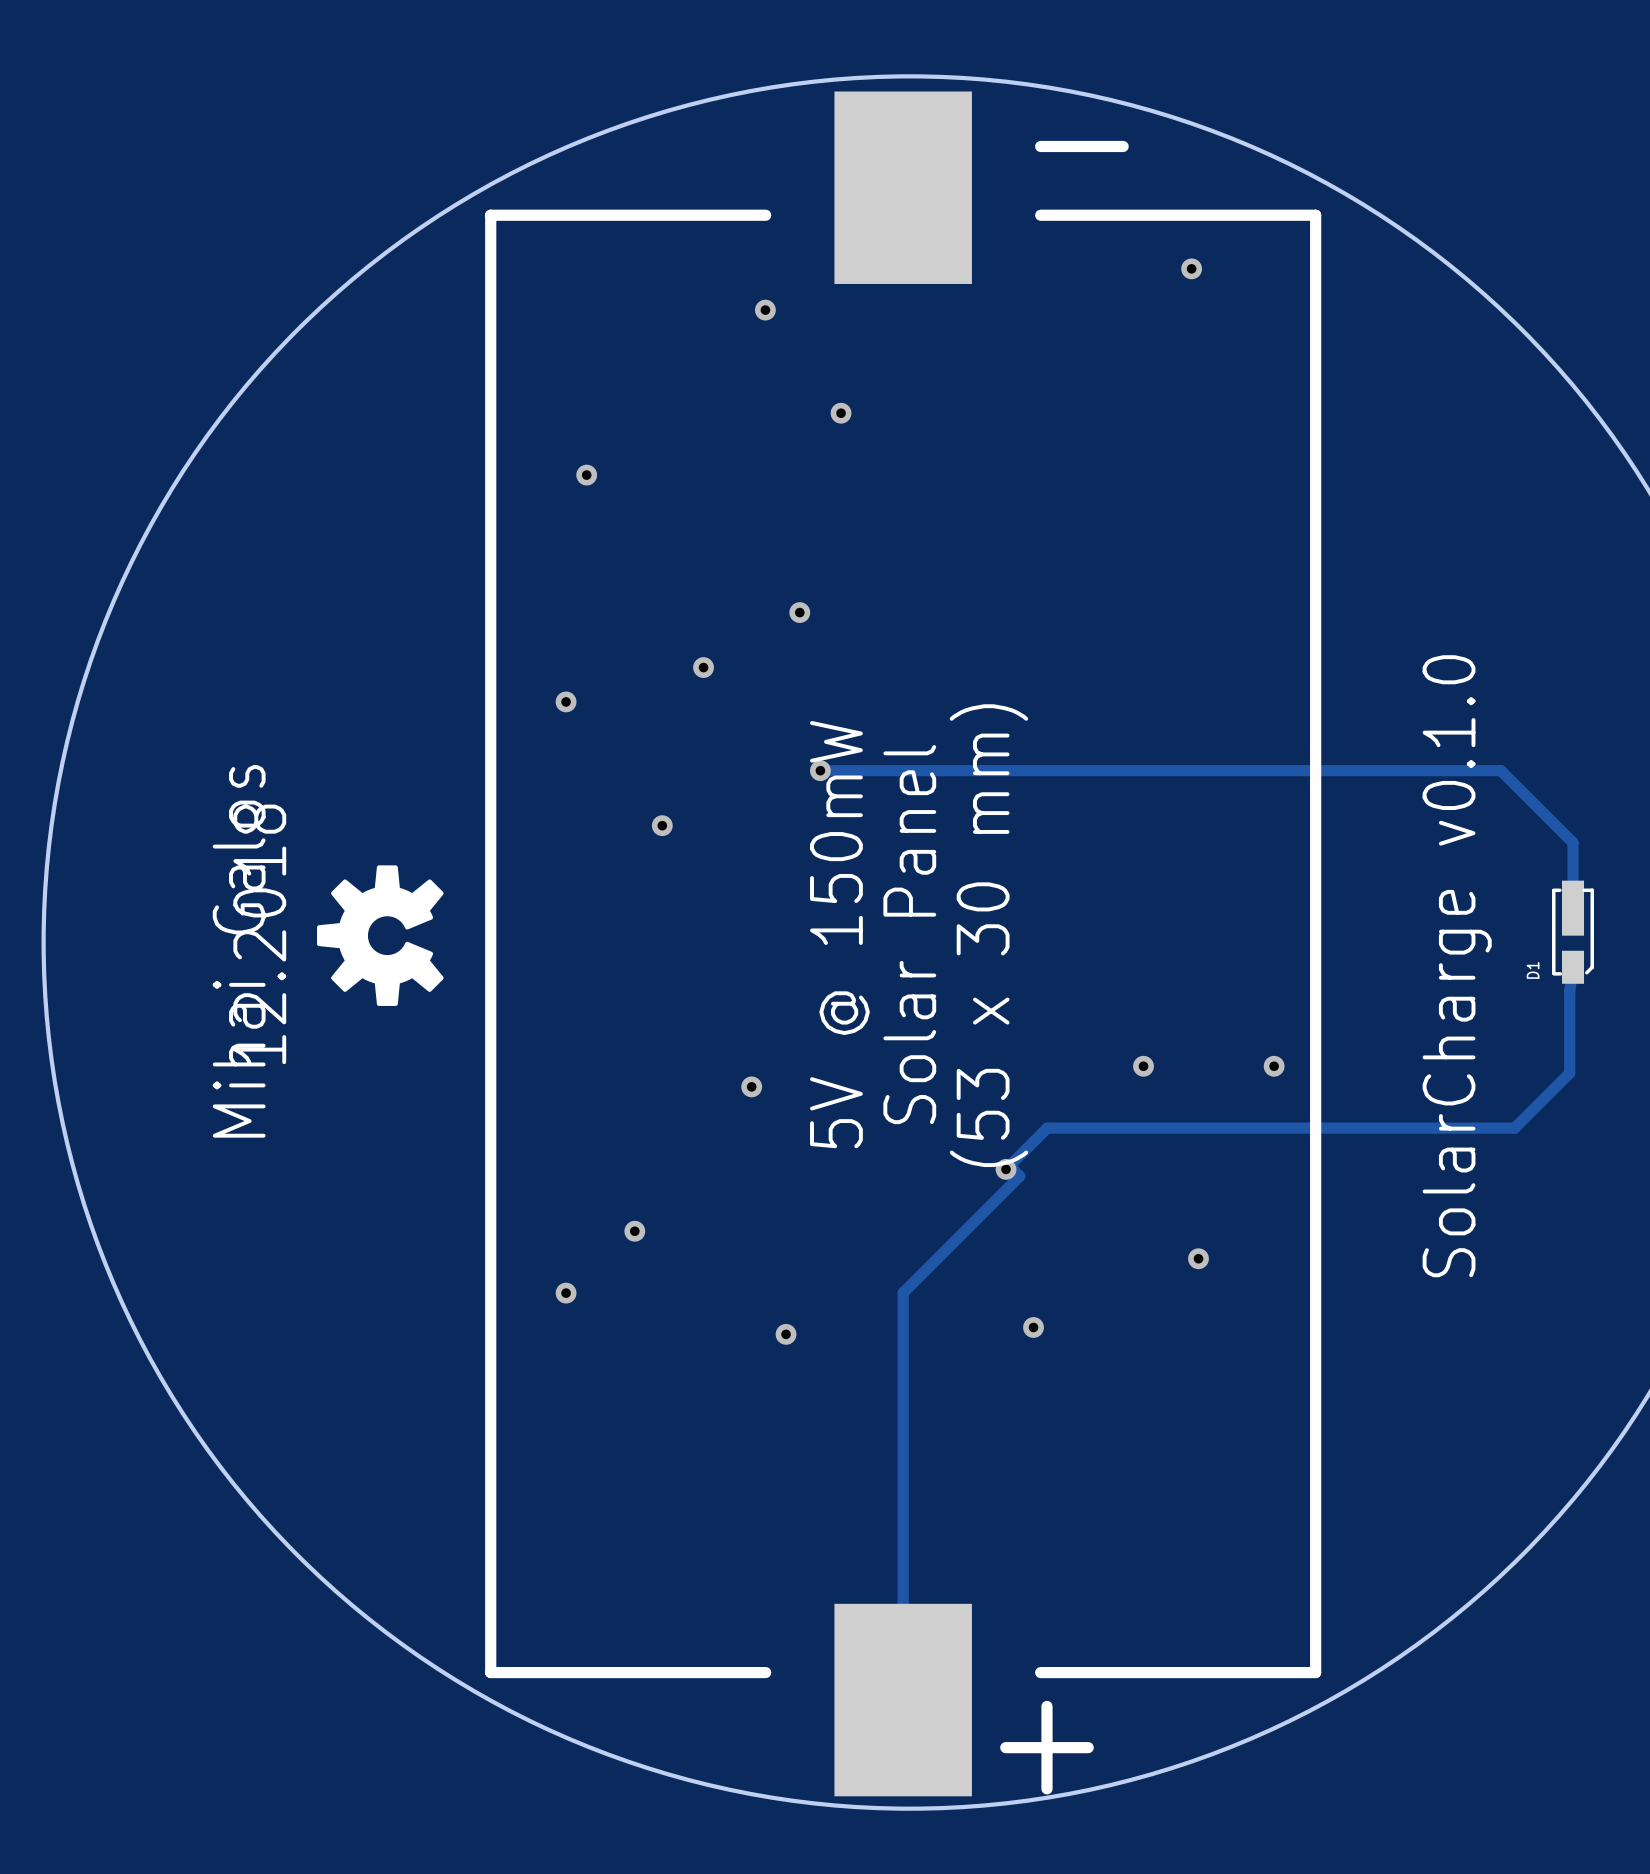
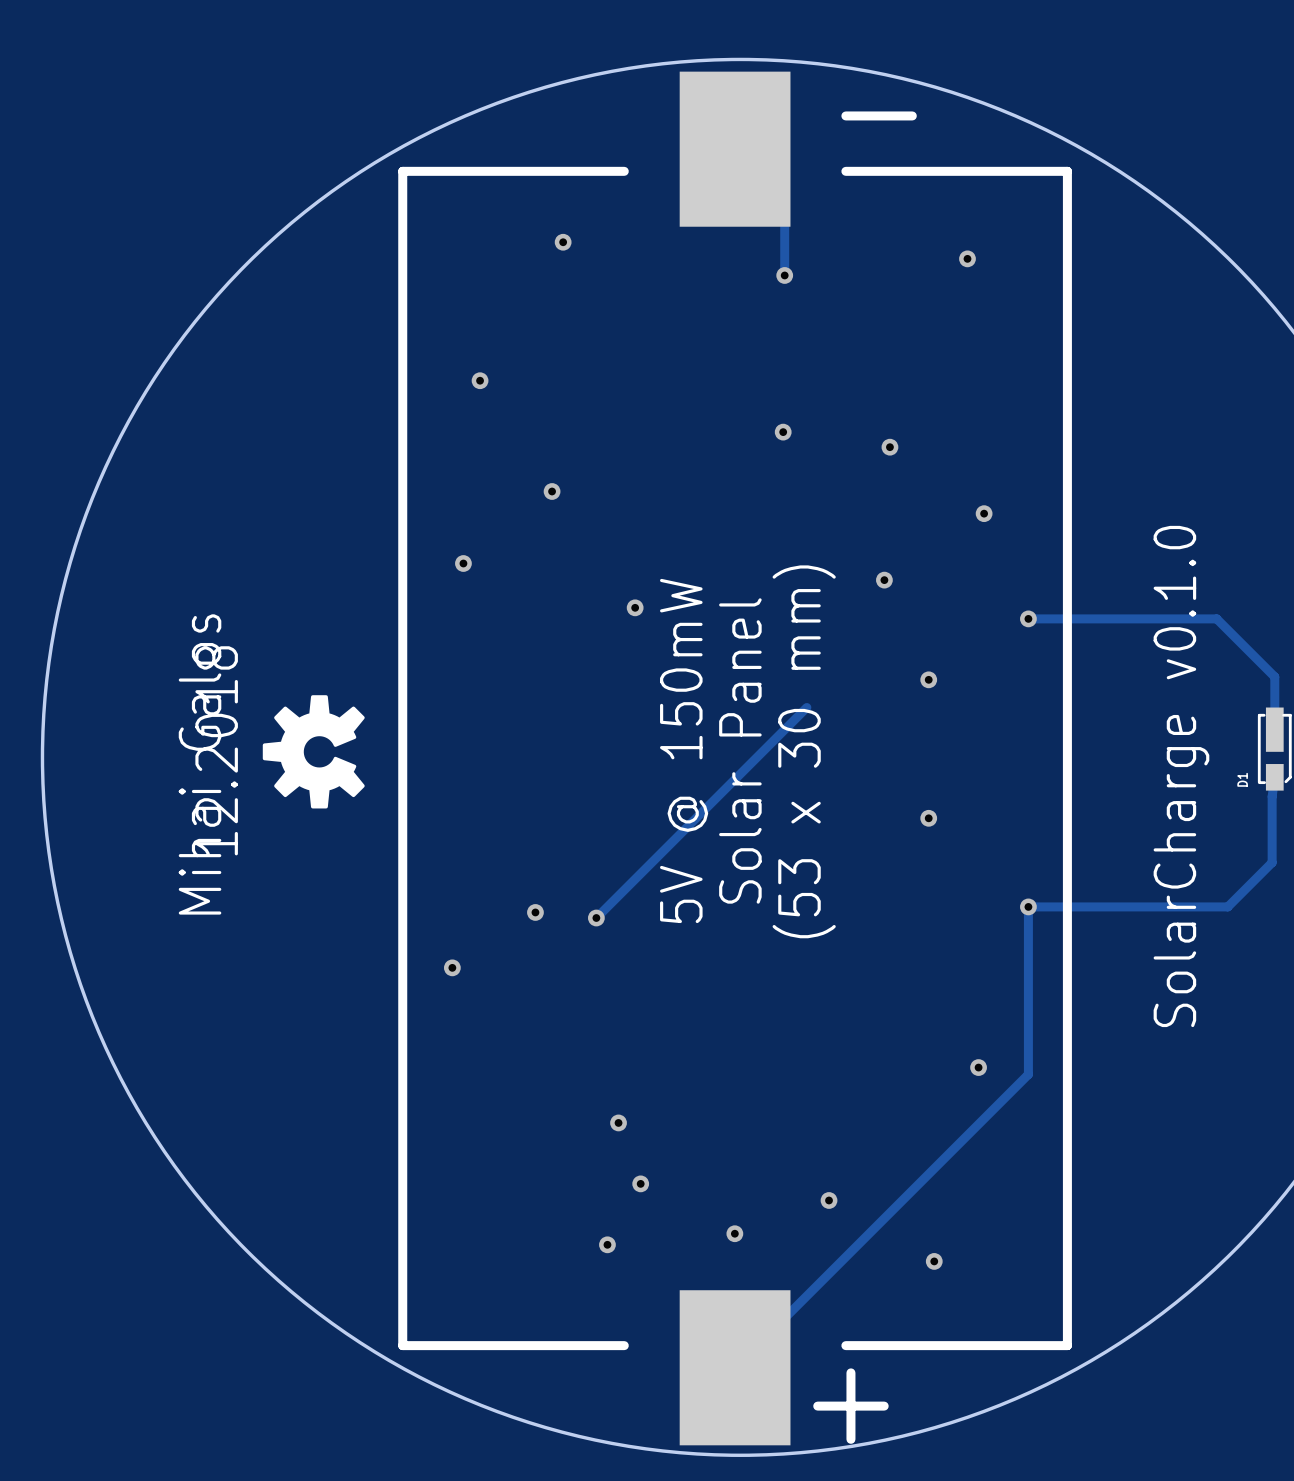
track: none -> (784, 198) (784, 275)
via position: (1191, 268) -> (967, 258)
via position: (765, 310) -> (563, 242)
via: none -> (784, 275)
via: (841, 413) -> none
via: none -> (783, 432)
via: none -> (889, 447)
via: none -> (552, 491)
via: (799, 612) -> none
via: none -> (984, 513)
via: (703, 667) -> none
via: none -> (884, 580)
track: (820, 770) (1267, 770) -> none
via position: (820, 770) -> (635, 607)
via: none -> (1028, 618)
via: (662, 825) -> none
via: none -> (928, 679)
track: none -> (806, 707) (596, 918)
via position: (1143, 1066) -> (928, 818)
via position: (1274, 1066) -> (1028, 906)
via: (751, 1086) -> none
track: (1267, 1128) (1047, 1128) (1006, 1169) (1012, 1169) (1019, 1176) (903, 1292) (903, 1700) -> (1028, 906) (1028, 1074) (735, 1367)
via: none -> (535, 912)
via: none -> (596, 918)
via: (1006, 1169) -> none
via: none -> (452, 967)
via: (634, 1231) -> none
via position: (1198, 1258) -> (978, 1067)
via: (566, 1293) -> none
via: (1033, 1327) -> none
via position: (786, 1334) -> (618, 1122)
via: none -> (640, 1183)
via: none -> (829, 1200)
via: none -> (734, 1233)
via: none -> (607, 1244)
via: none -> (934, 1261)

